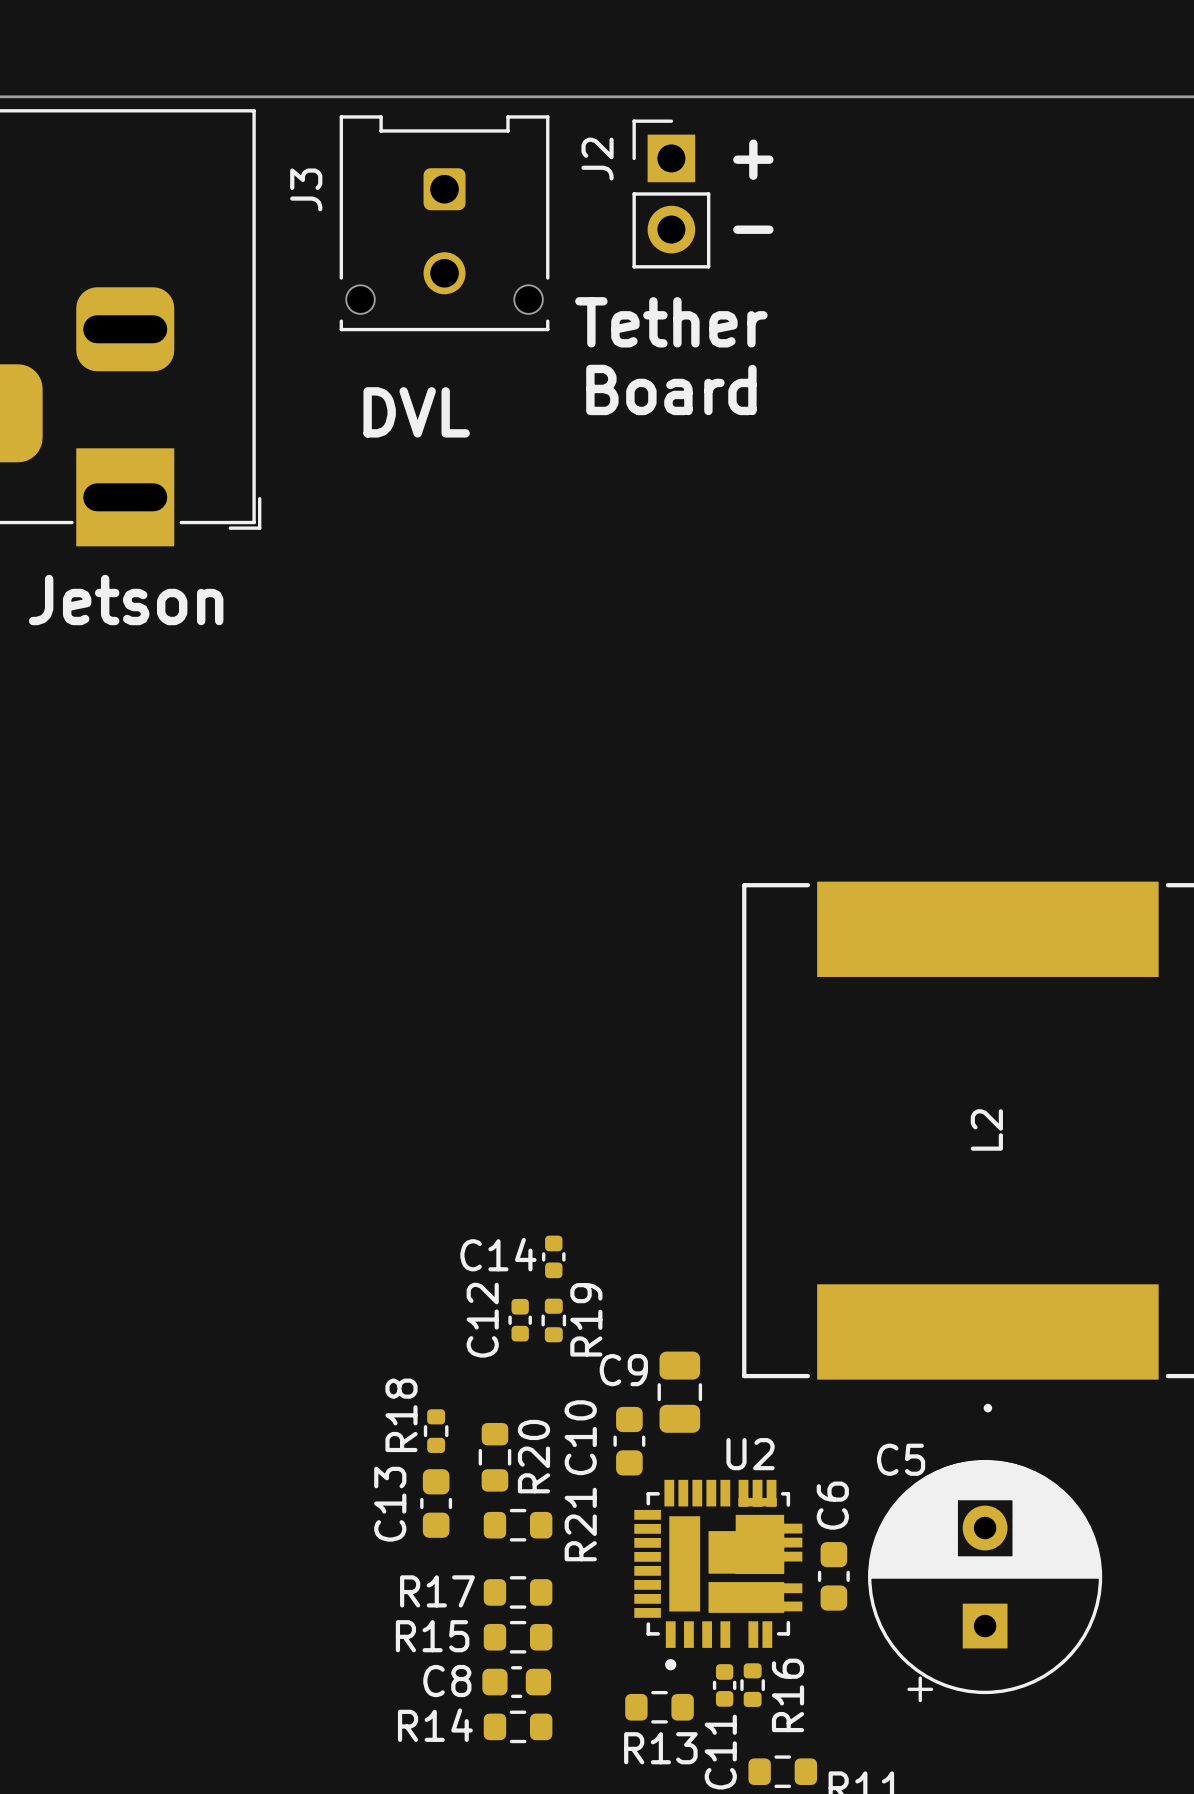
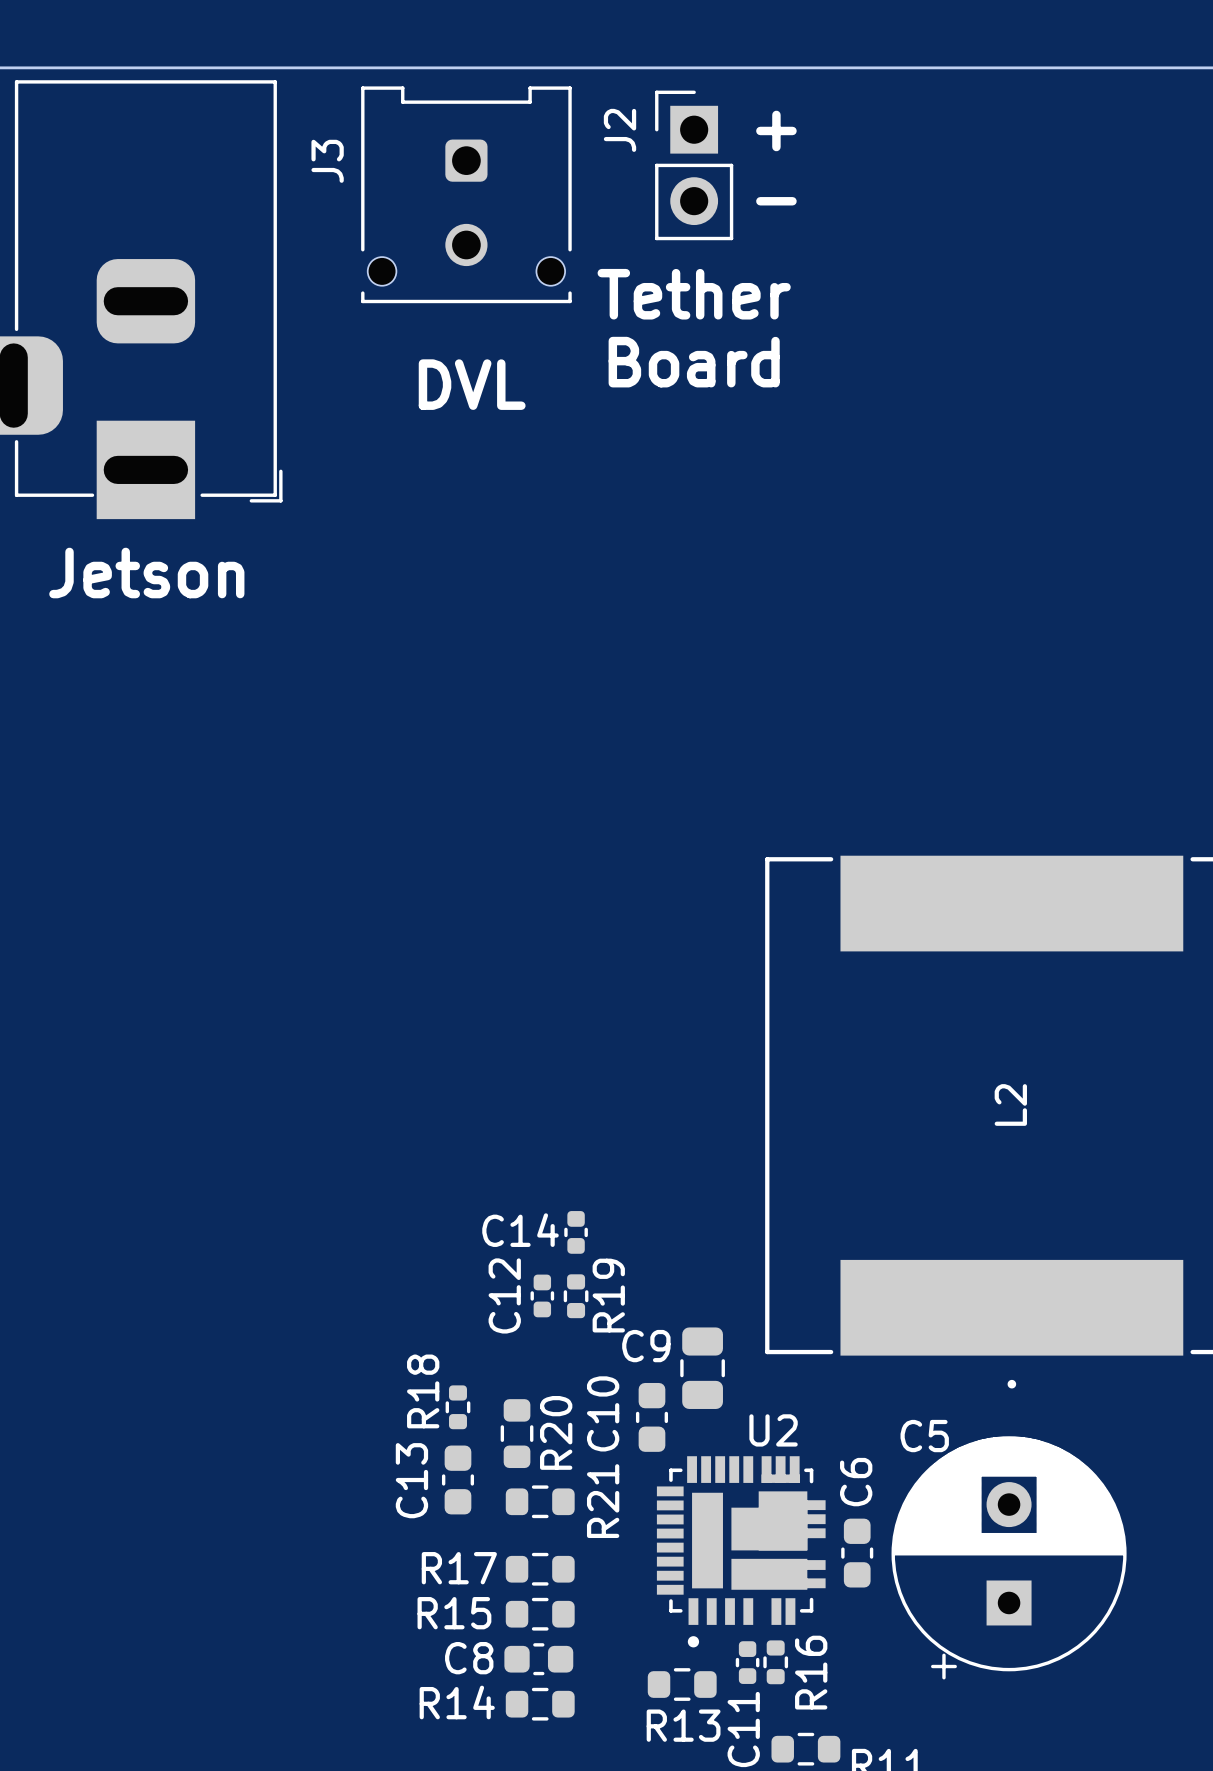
text position: DVL (416, 412) -> DVL (472, 384)

